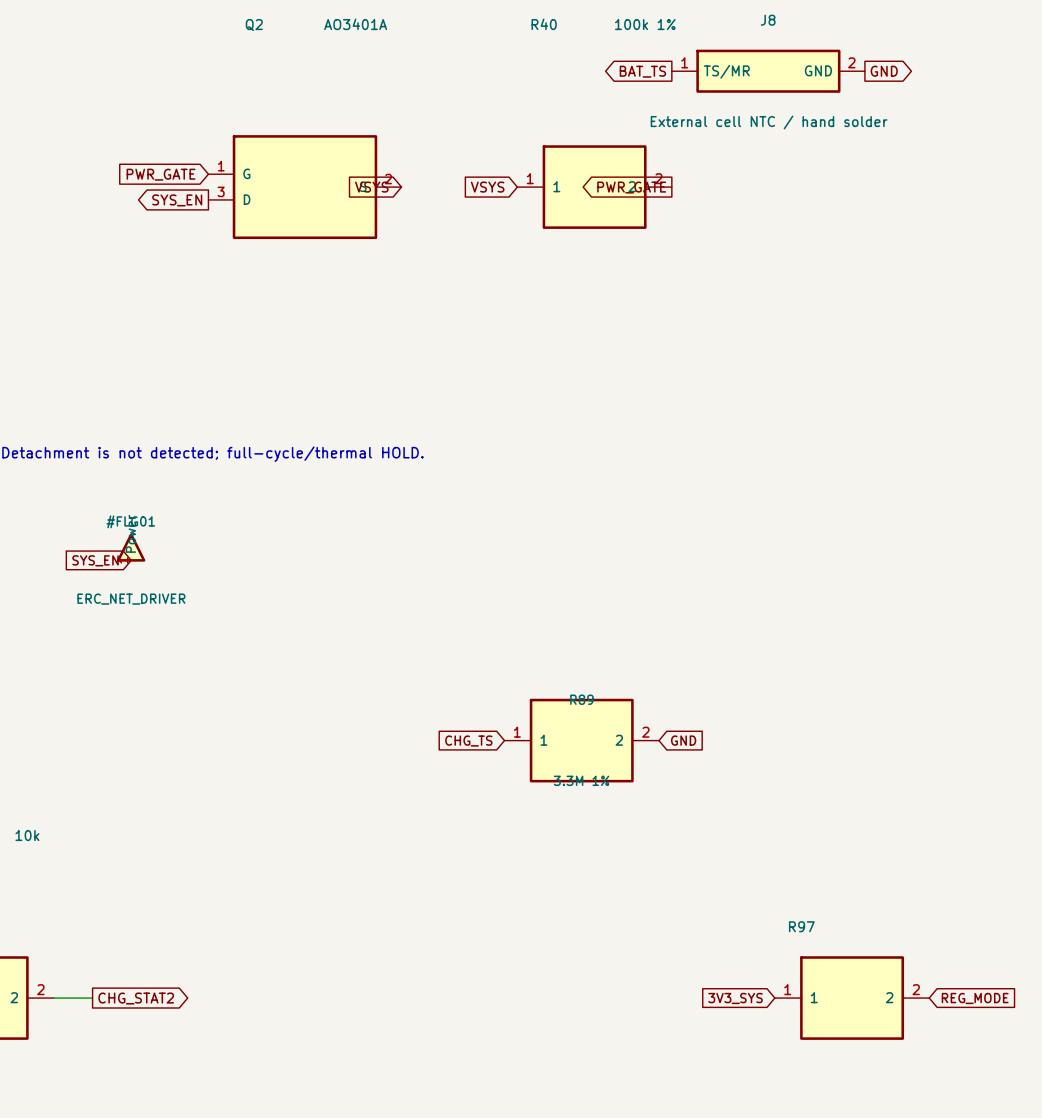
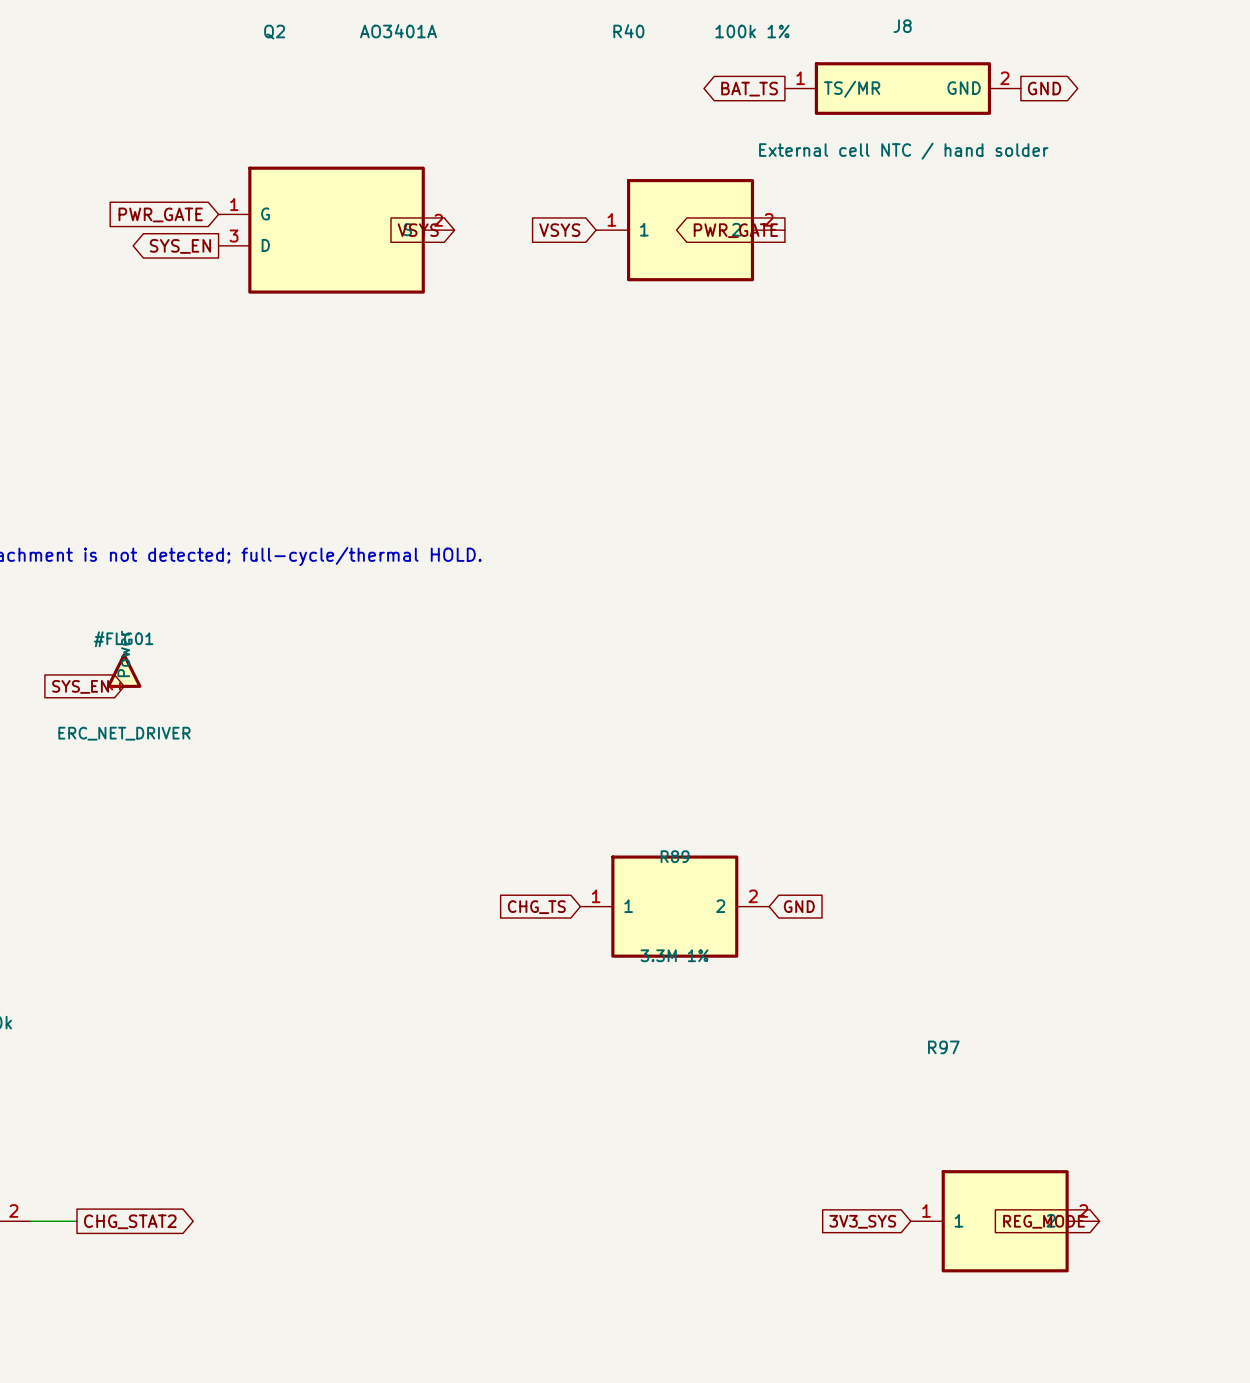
R97 name position: R97 (801, 926) -> R97 (943, 1047)
global label rotation: 0° (975, 998) -> 180° (1044, 1221)
global label position: REG_MODE (975, 998) -> REG_MODE (1044, 1221)

